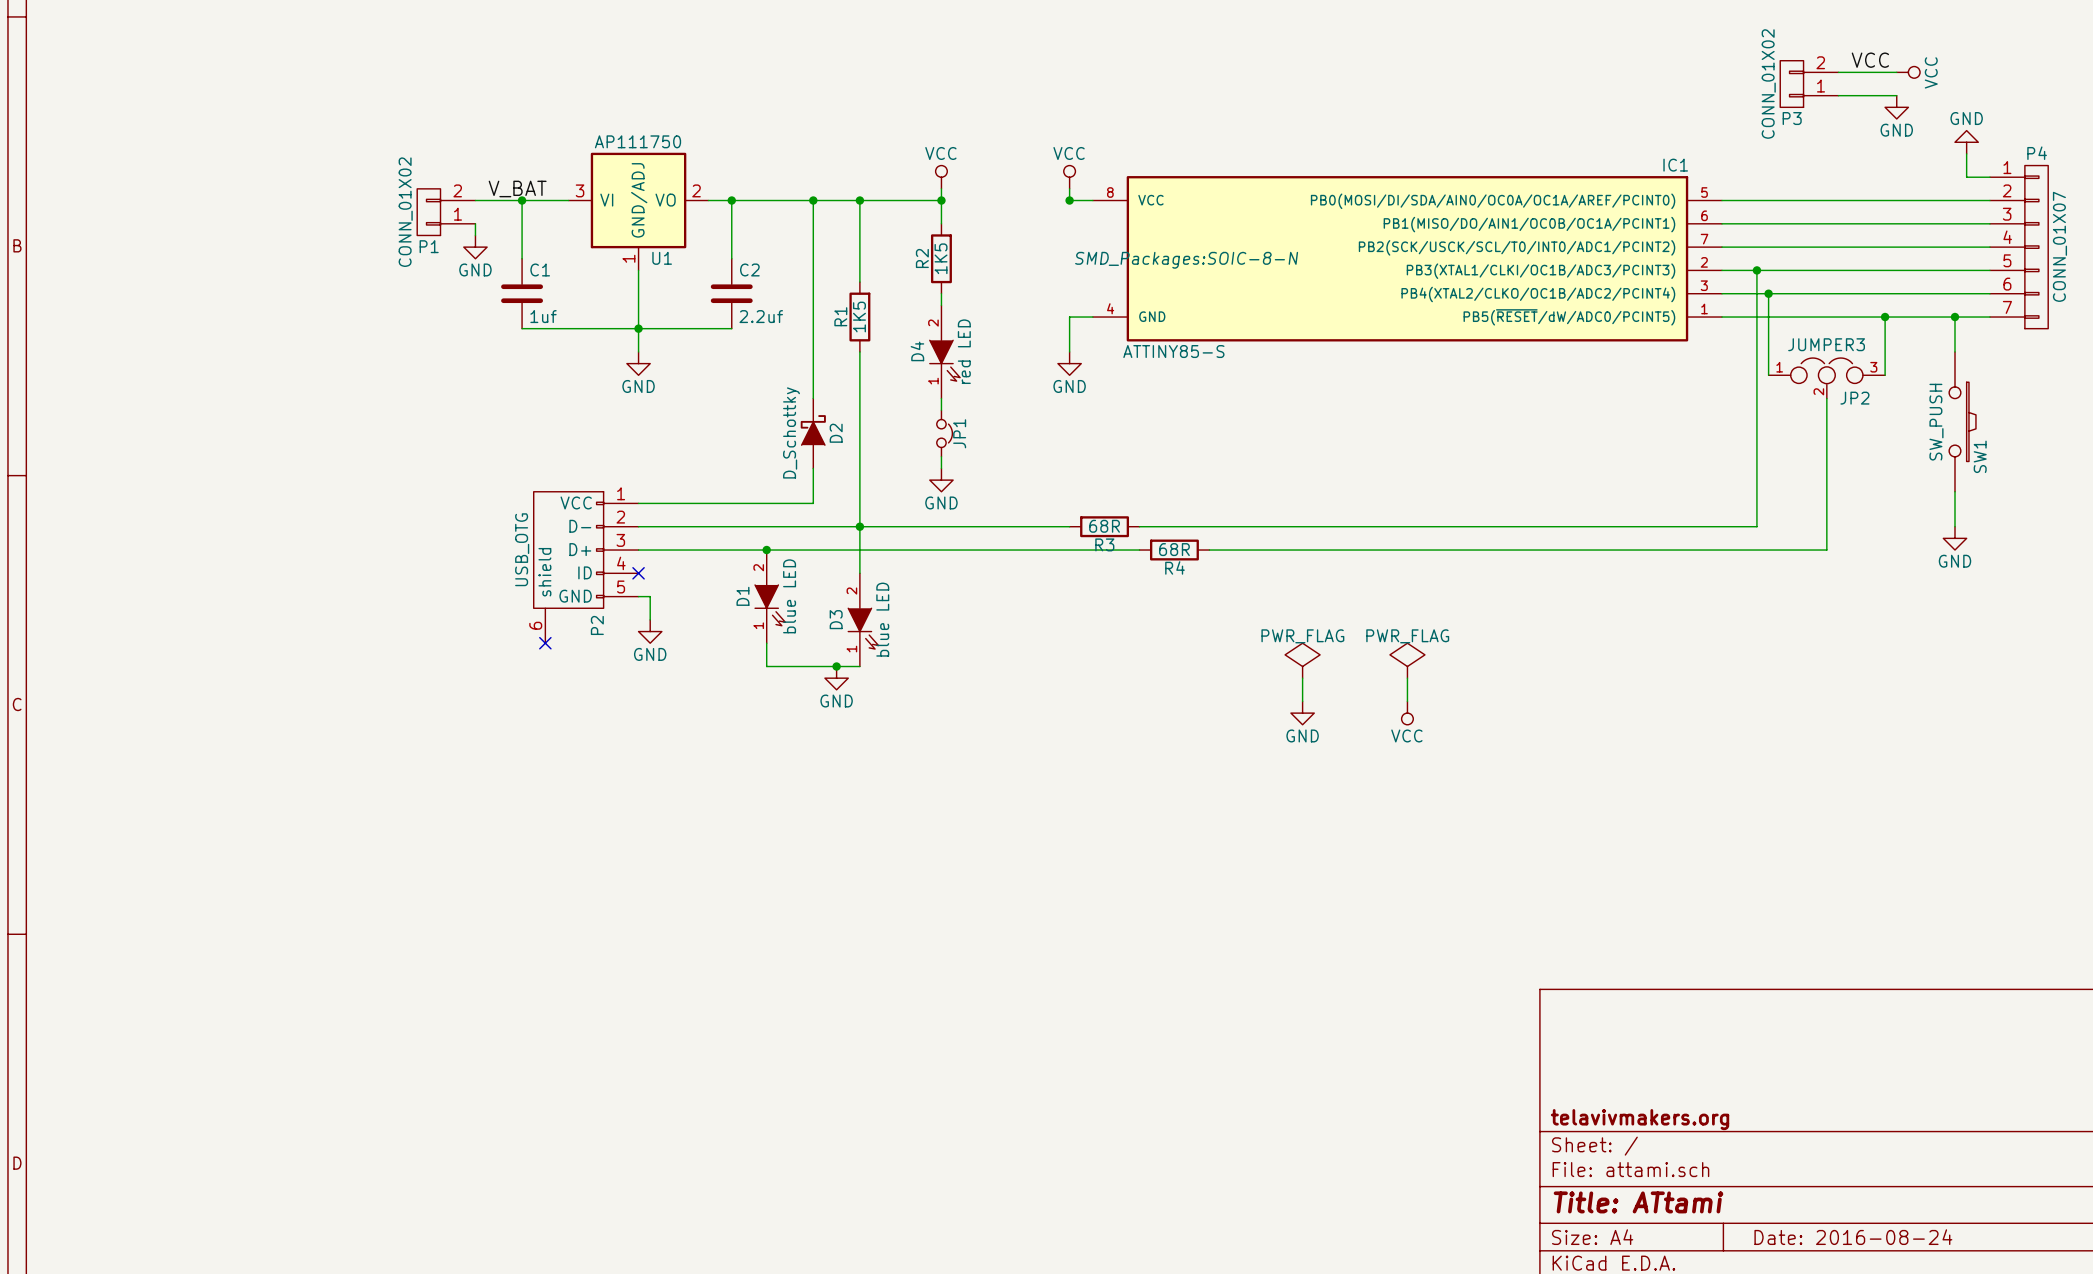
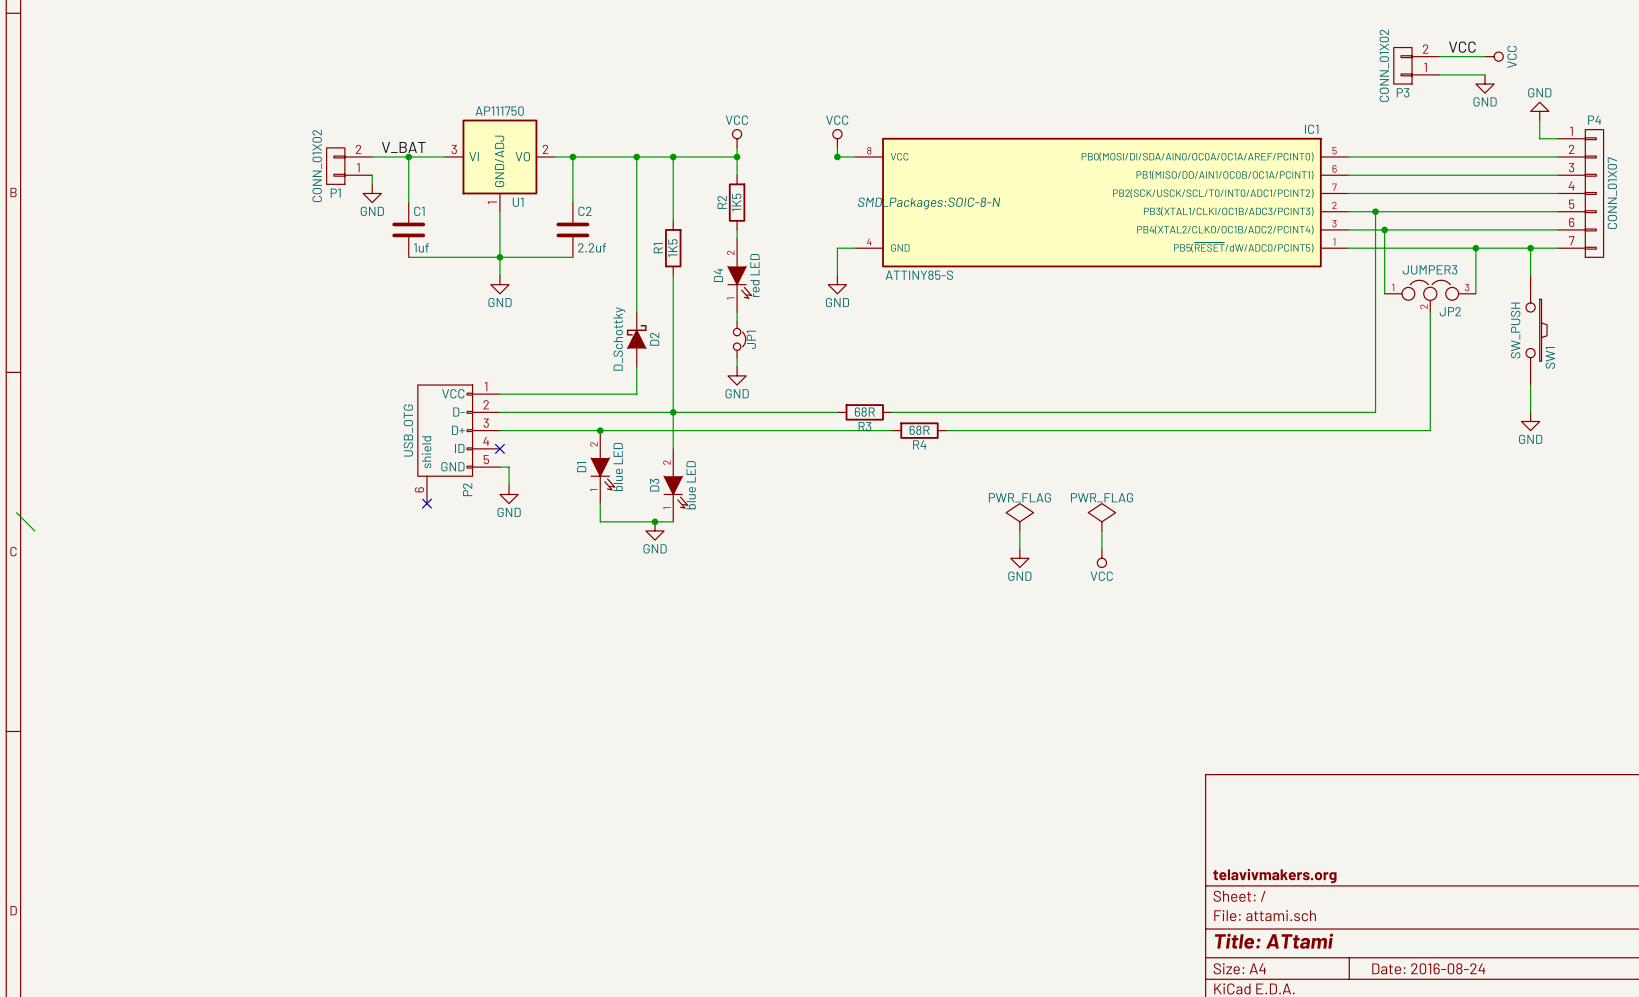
wire: none -> (16, 512) (34, 530)

